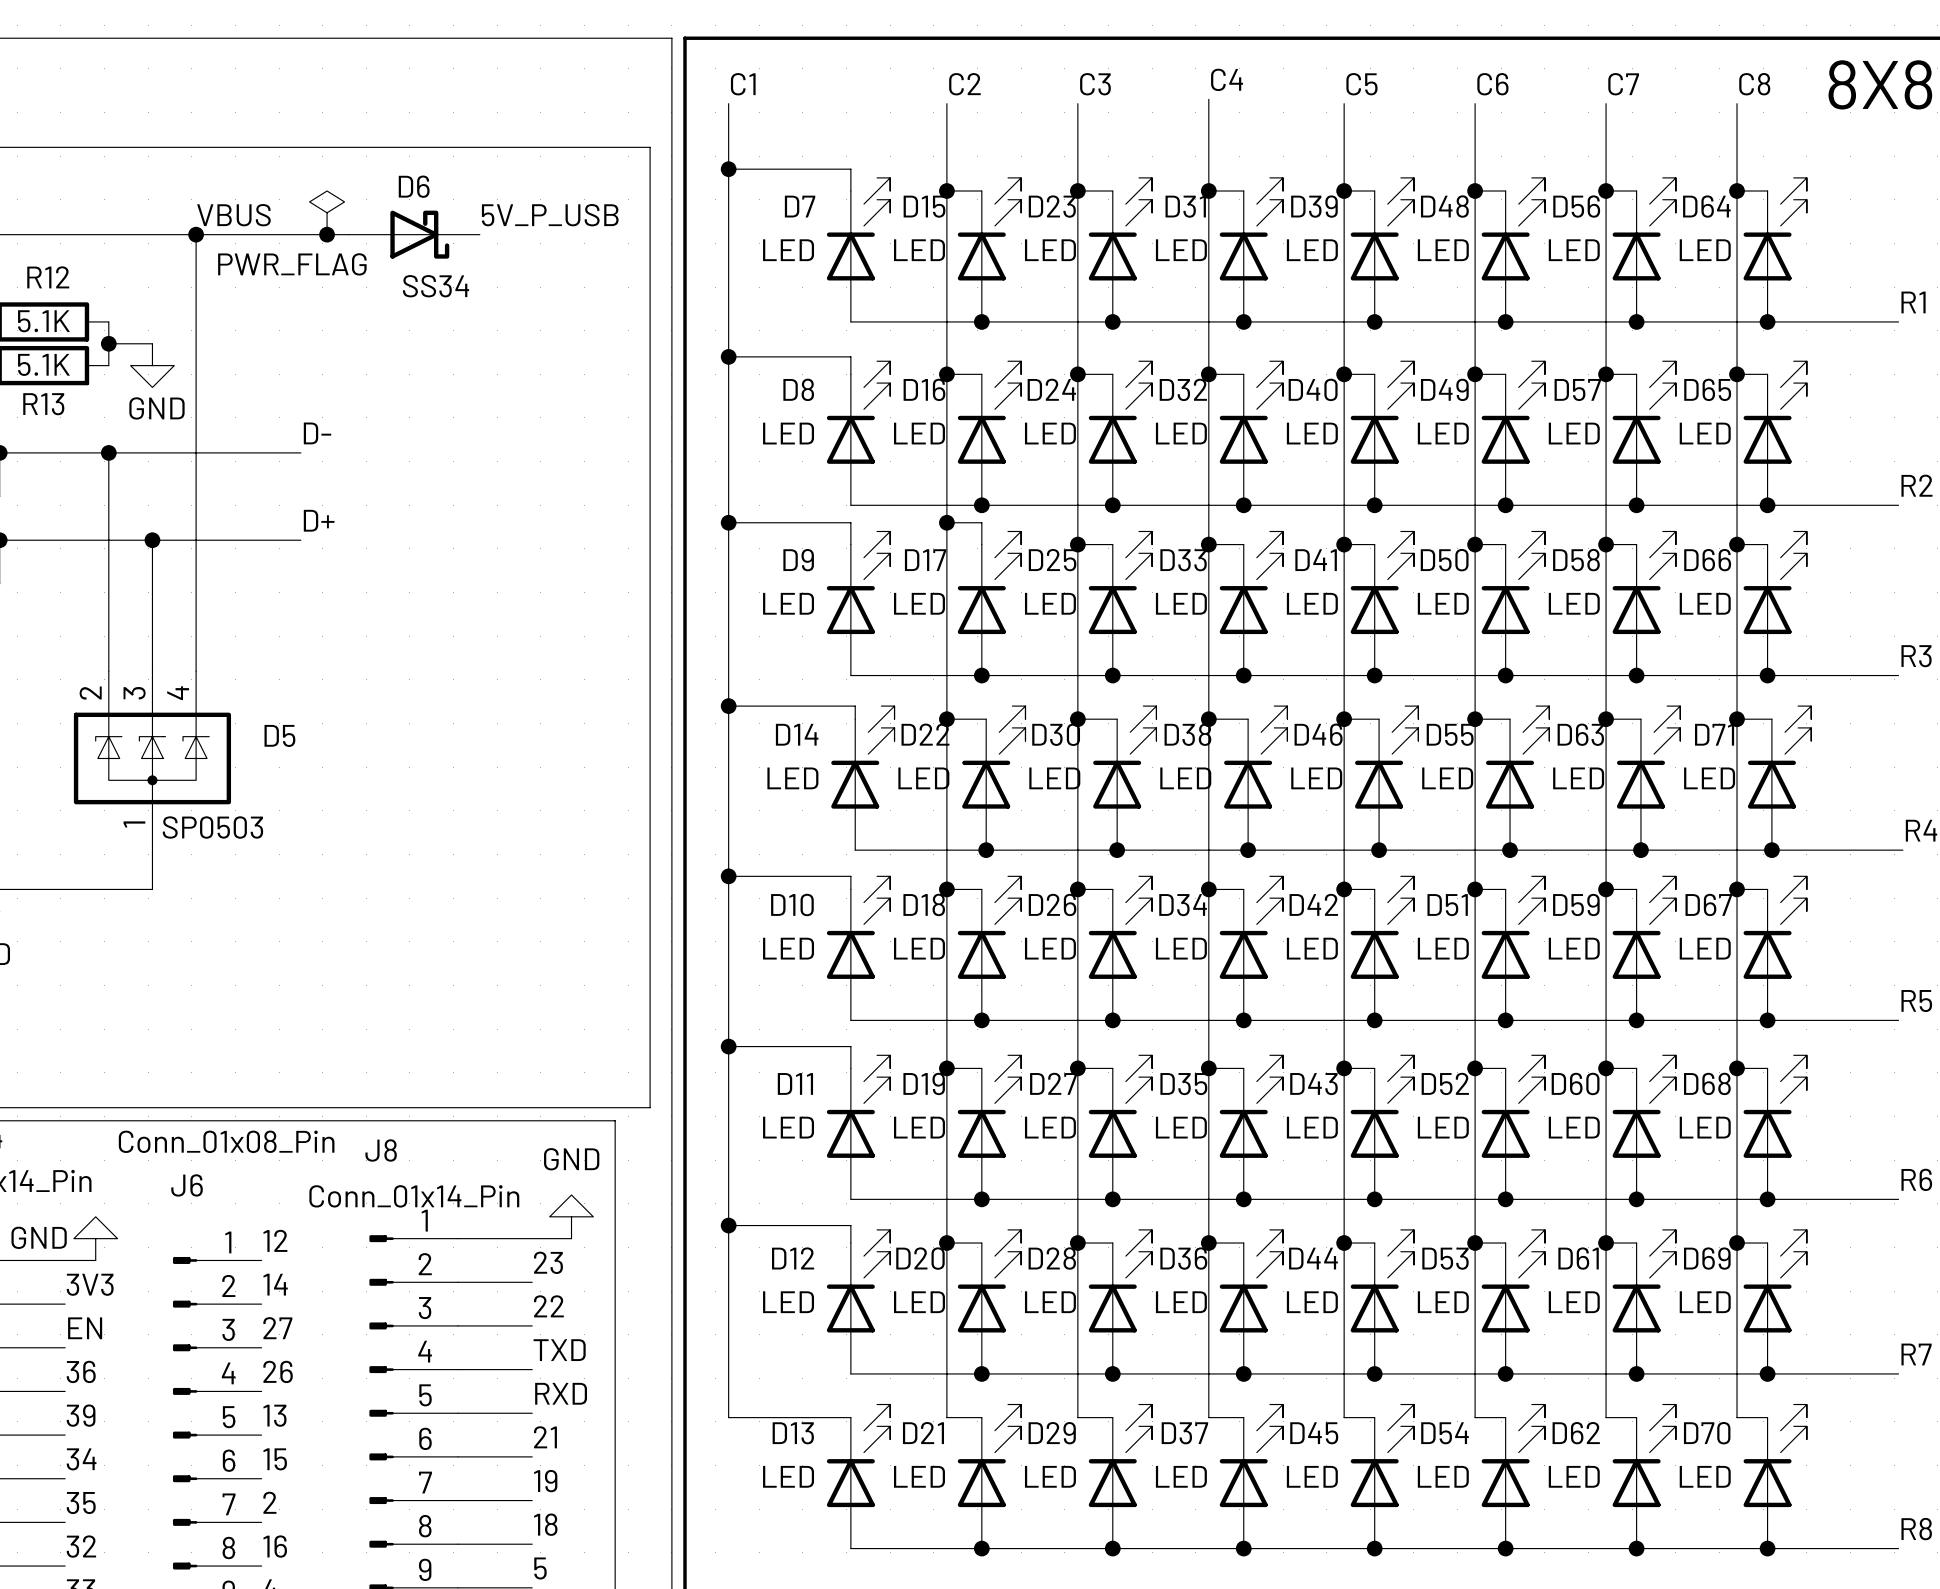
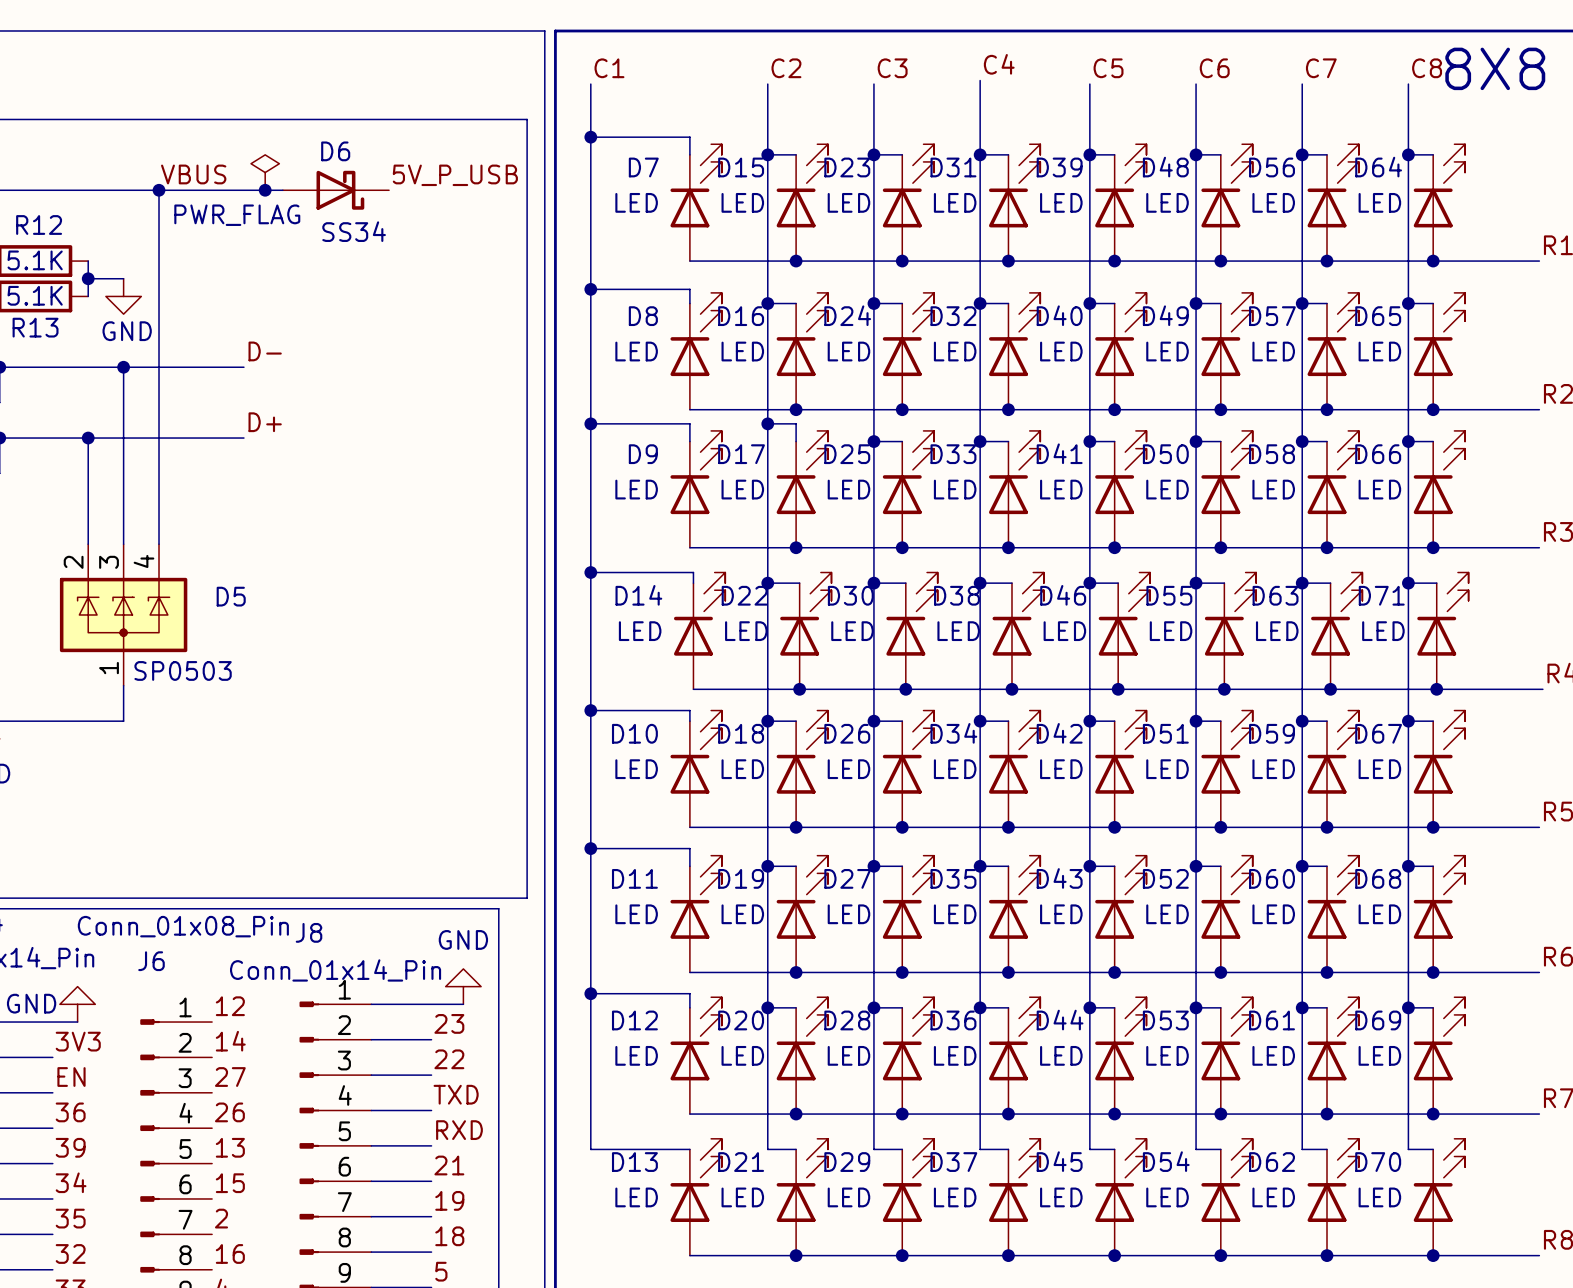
wire: (108, 452) (108, 540) -> (123, 367) (123, 438)
junction: (108, 452) -> none
junction: none -> (123, 367)
junction: none -> (88, 438)
junction: (152, 540) -> none

